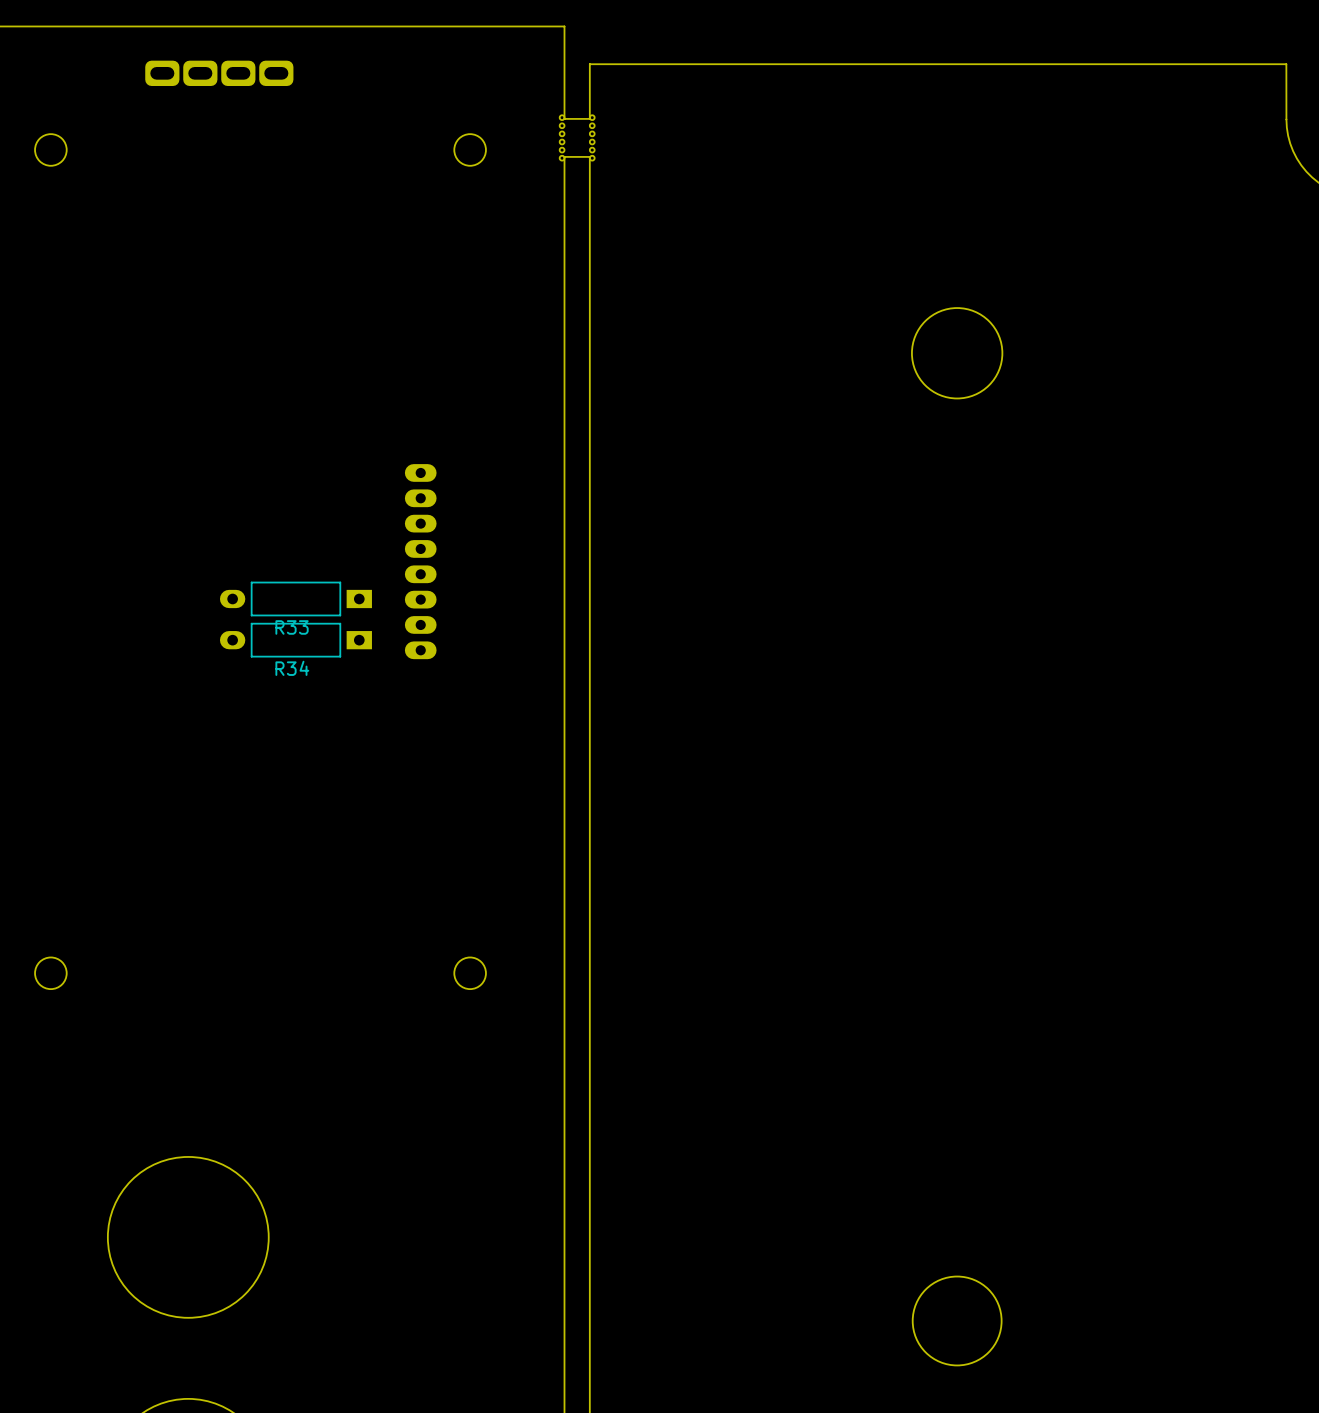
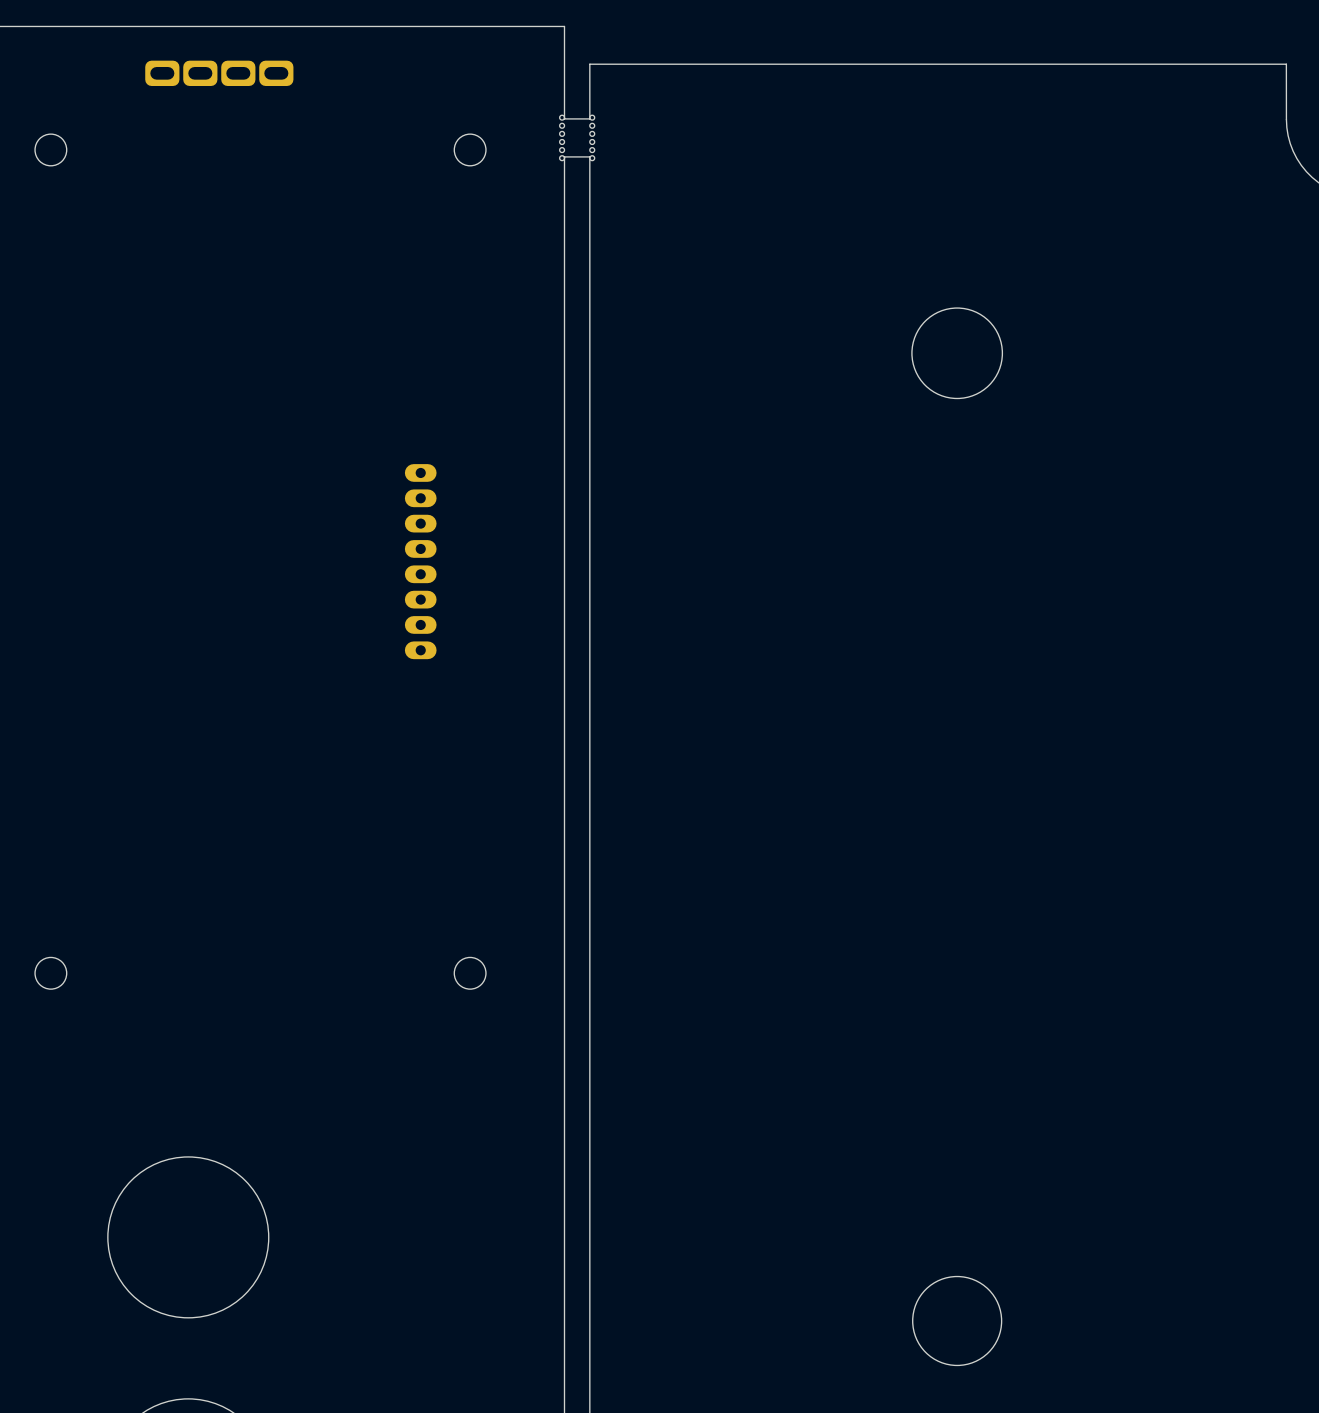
R33: (295, 598) -> none
R34: (295, 640) -> none

